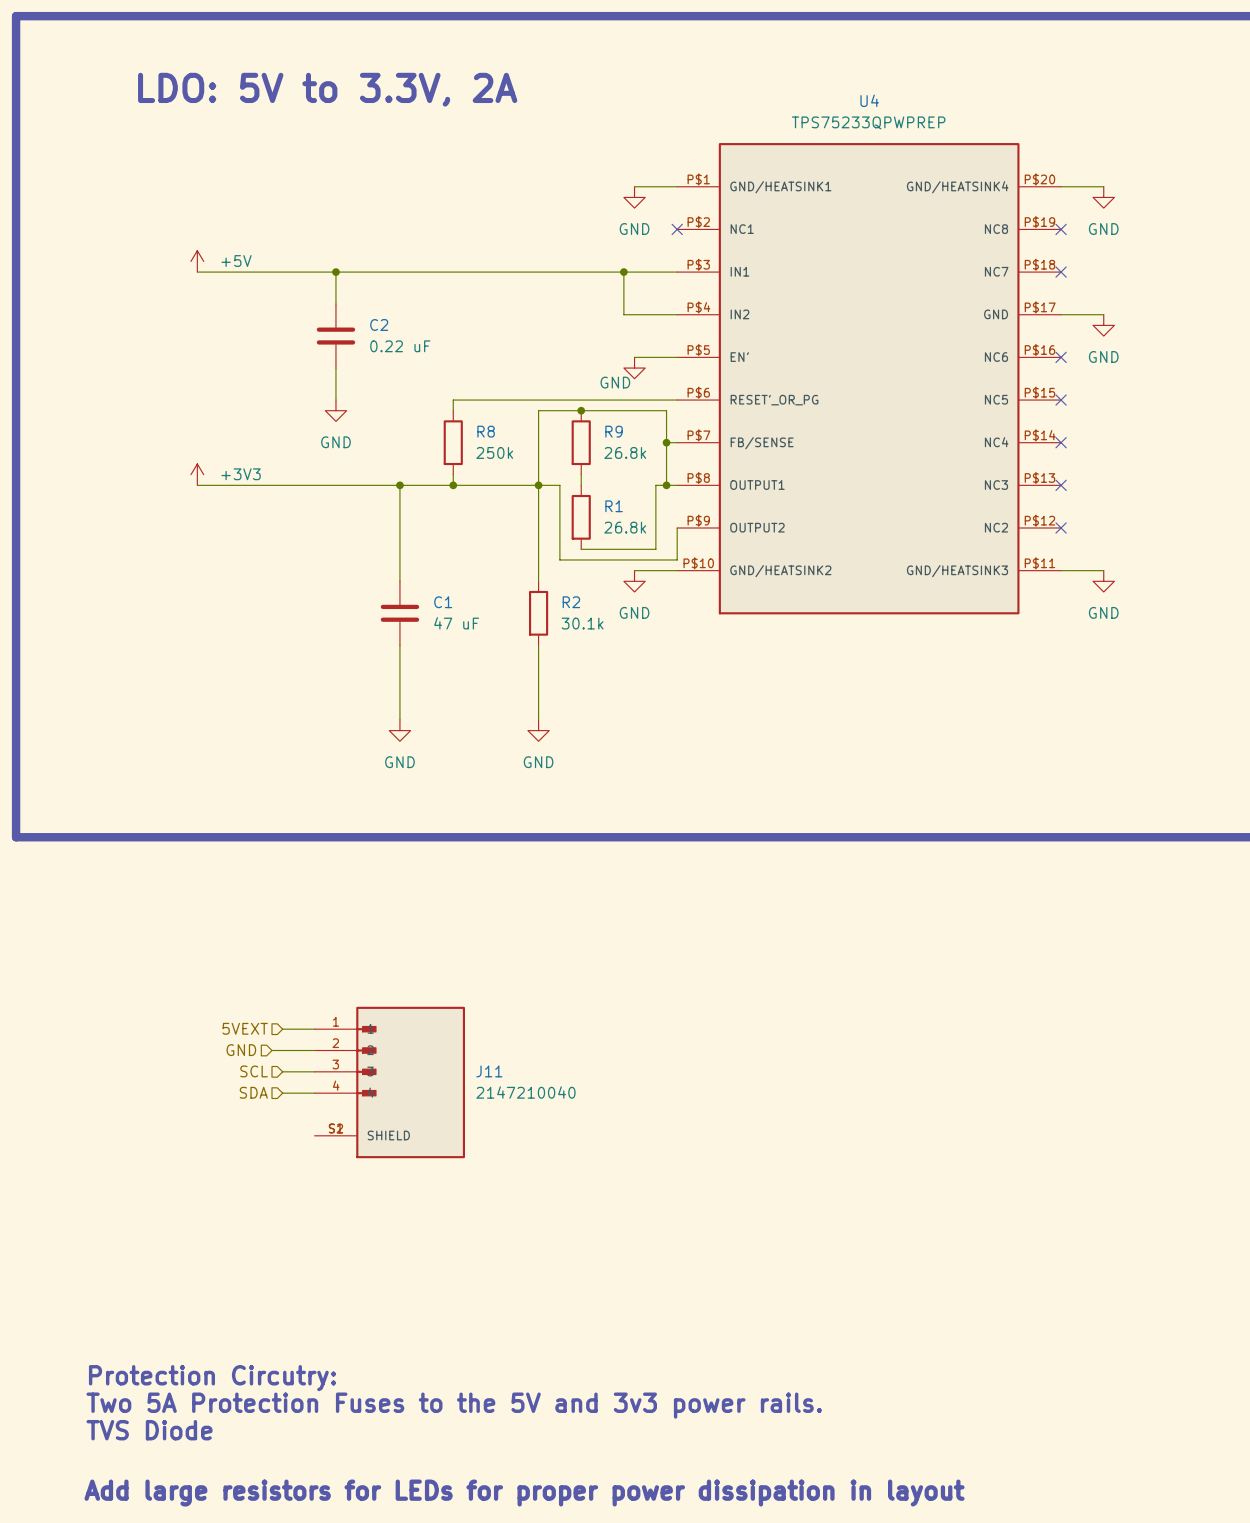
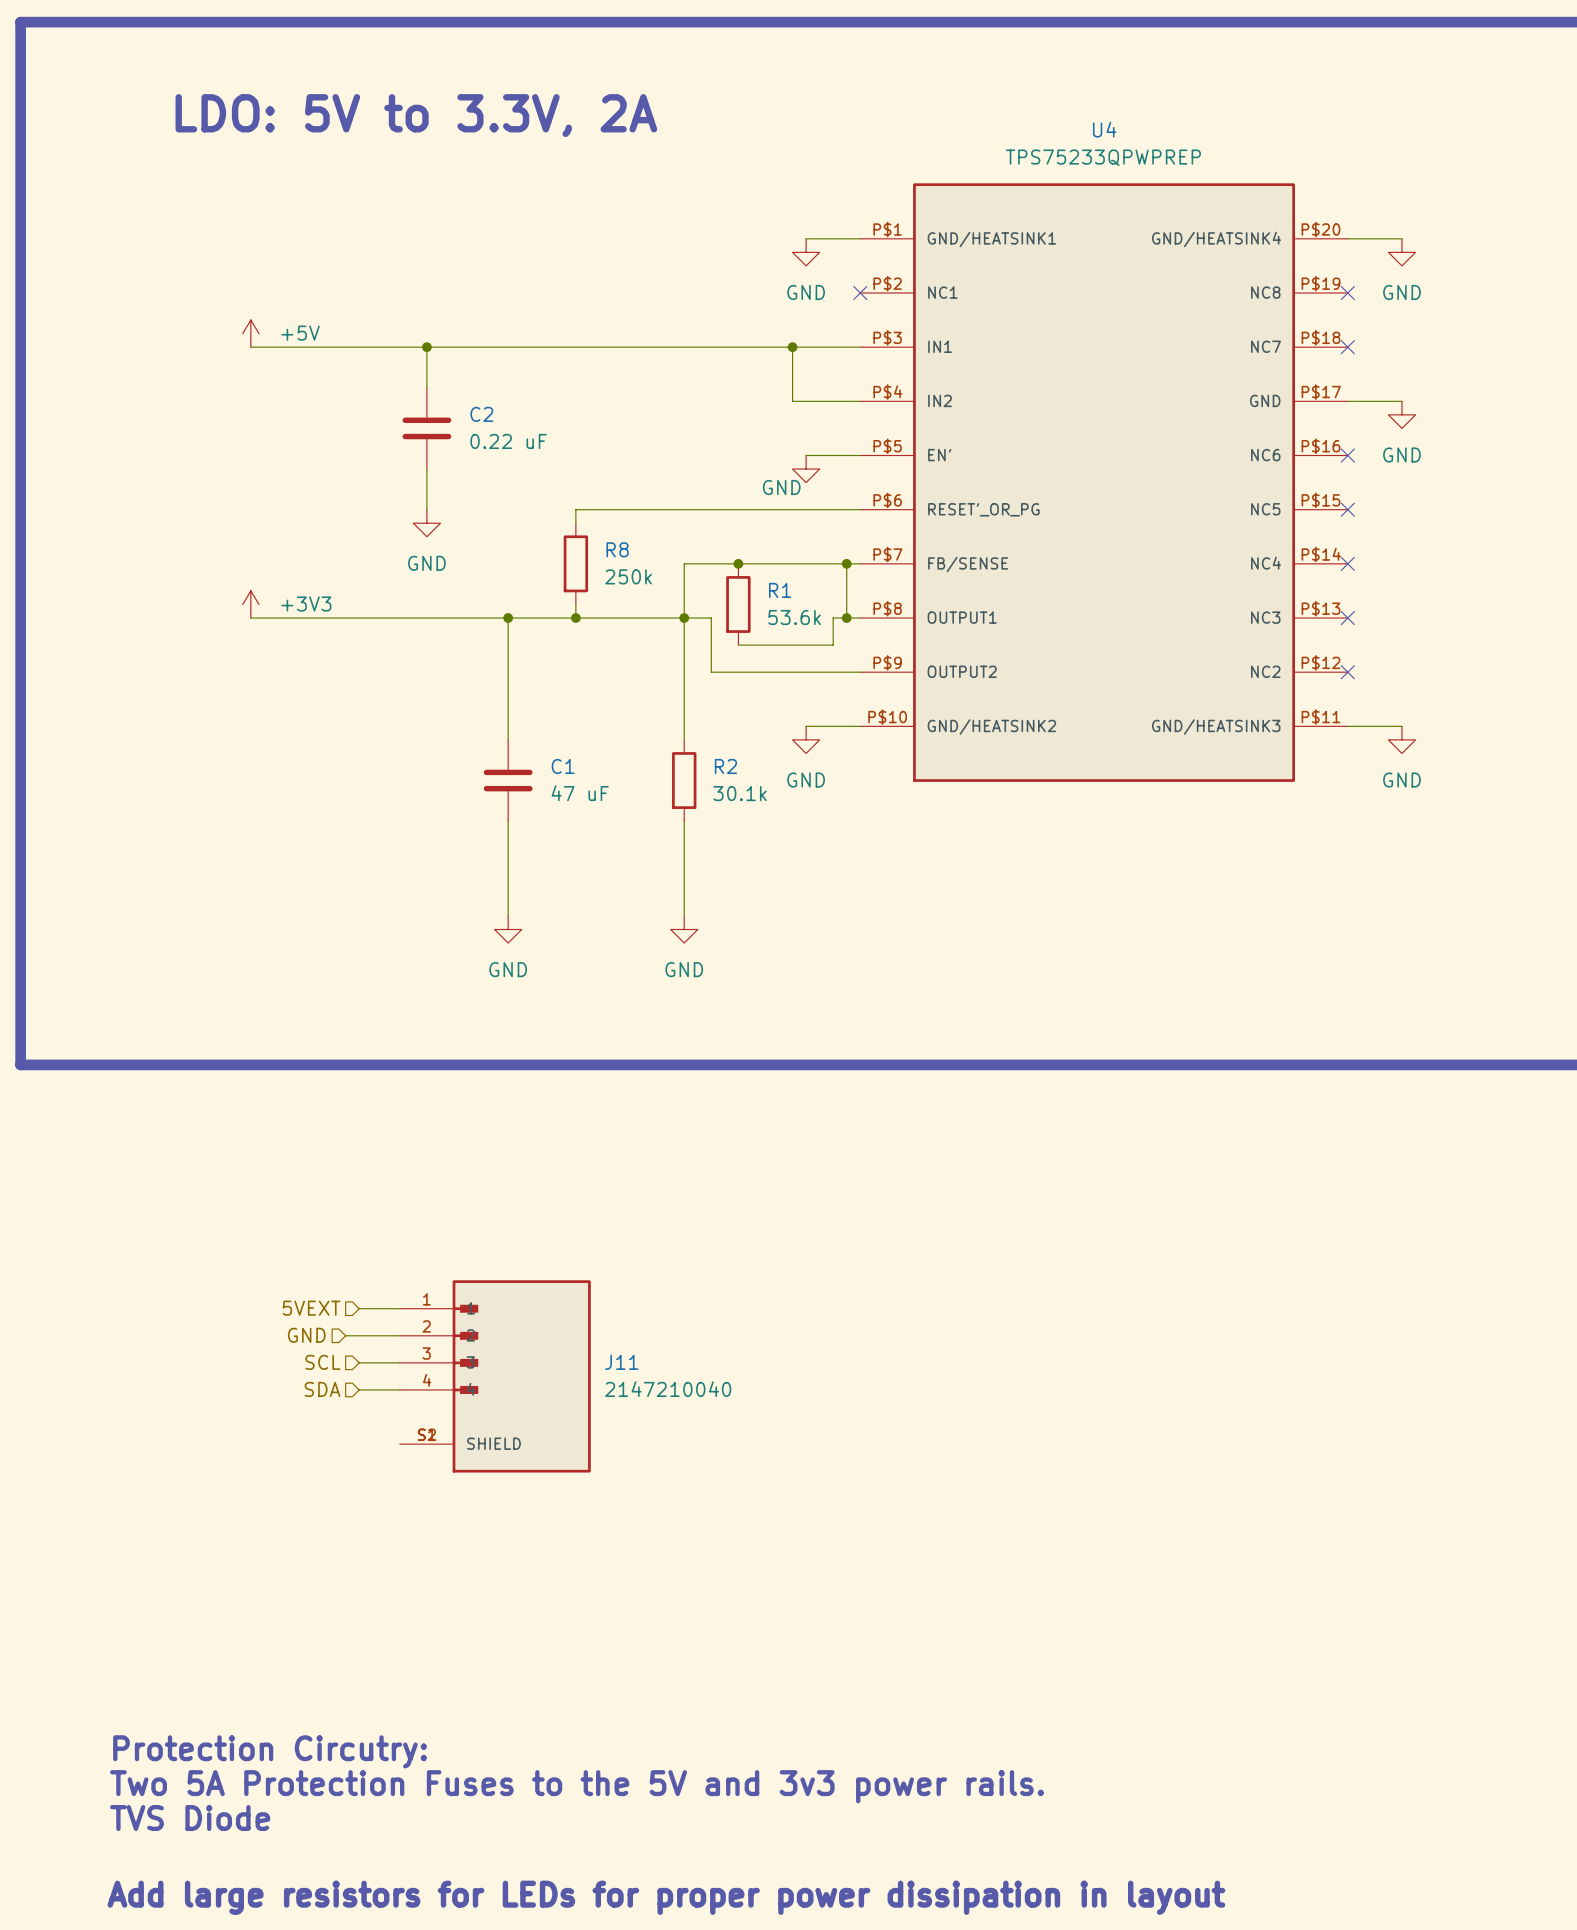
junction position: (581, 410) -> (738, 563)
wire: (538, 442) (538, 410) (666, 410) (666, 442) -> (684, 563) (846, 563)
R9: 26.8k (581, 442) -> none
wire: (581, 474) (581, 485) -> none
wire: (655, 506) (655, 549) (581, 549) -> (833, 645) (738, 645)
R1 position: (581, 517) -> (738, 604)
R1 value: 26.8k (625, 527) -> 53.6k (794, 617)
wire: (559, 528) (559, 559) (677, 559) (677, 528) -> (711, 672) (860, 672)

